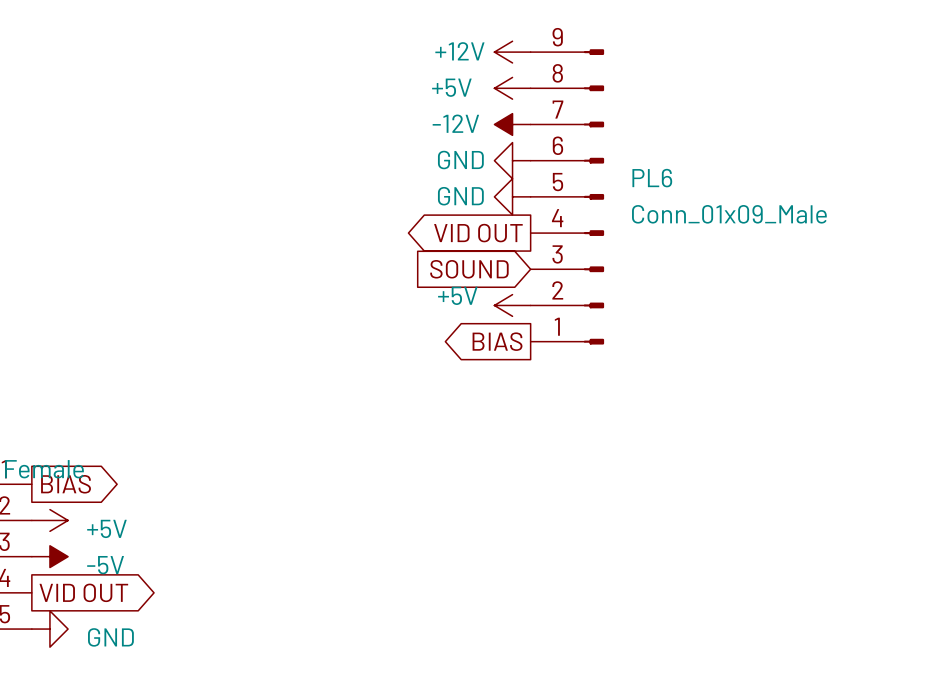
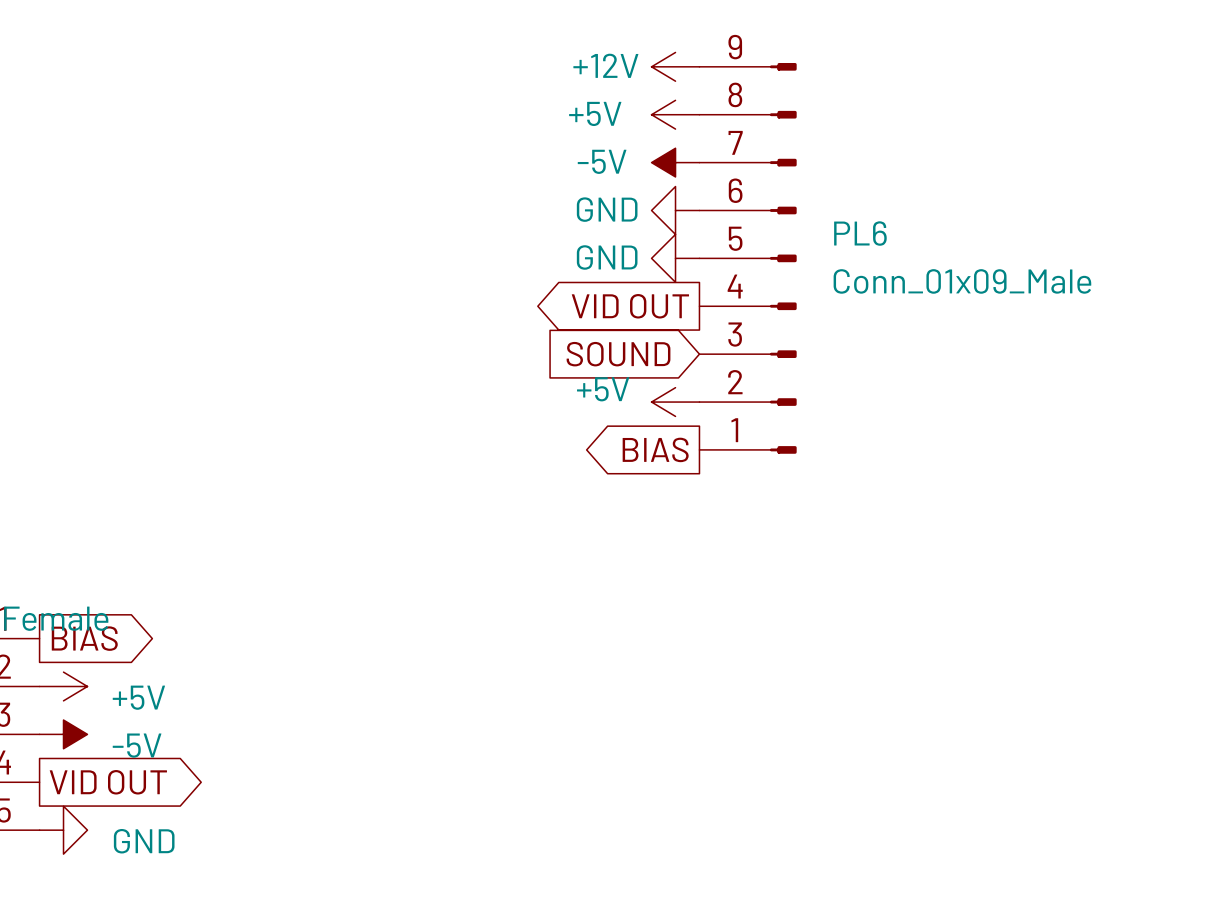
power symbol: -12V (512, 124) -> -5V (675, 162)

